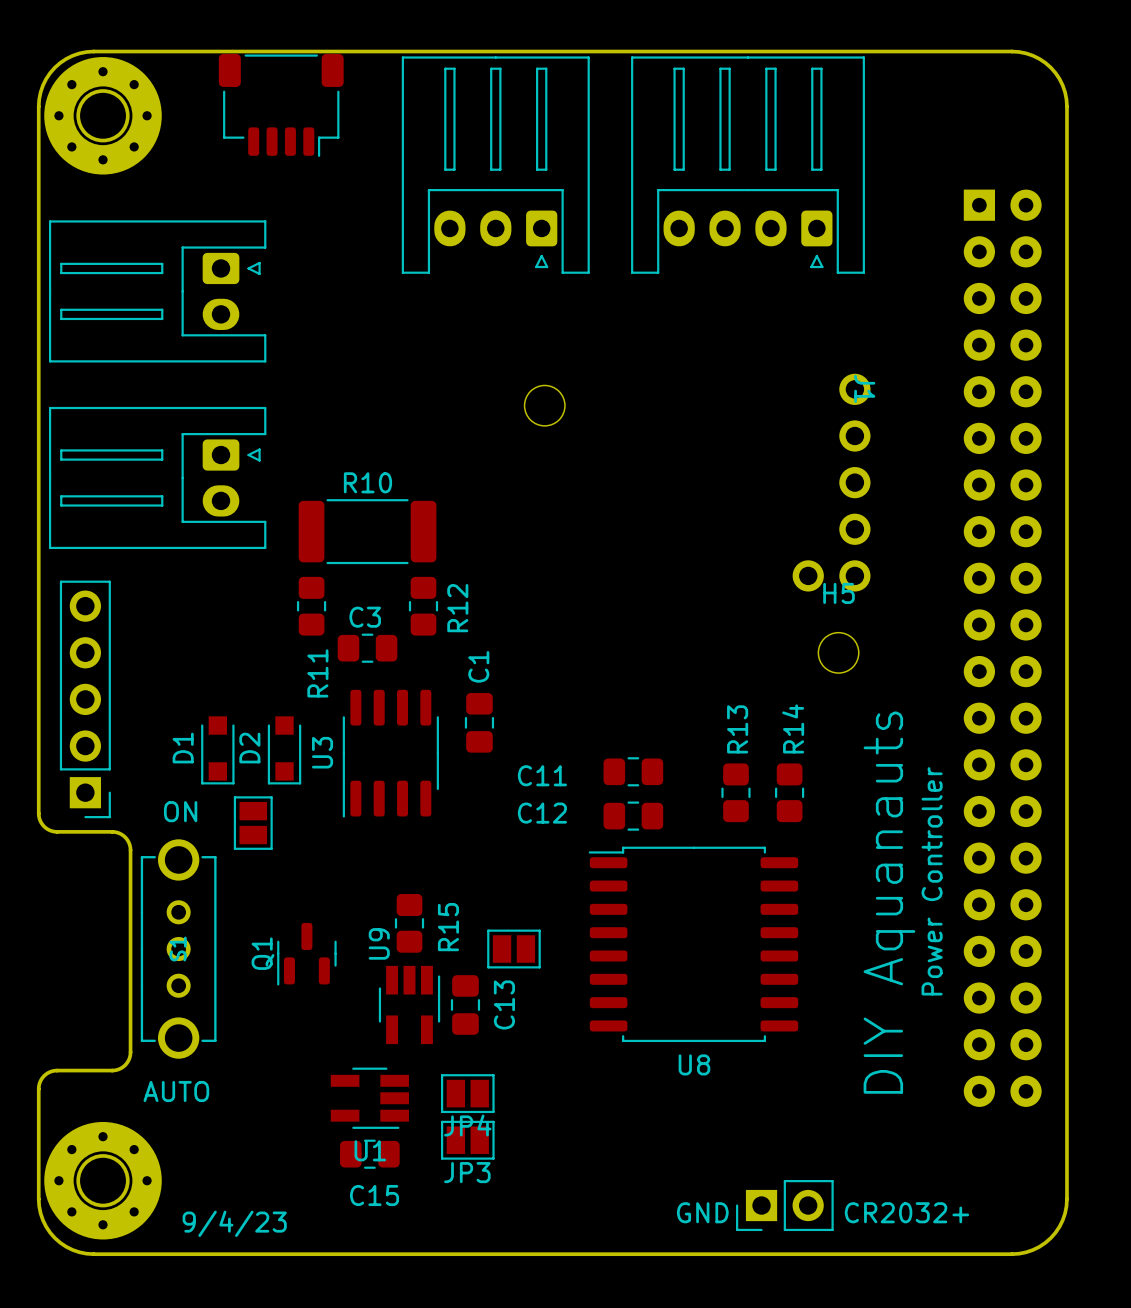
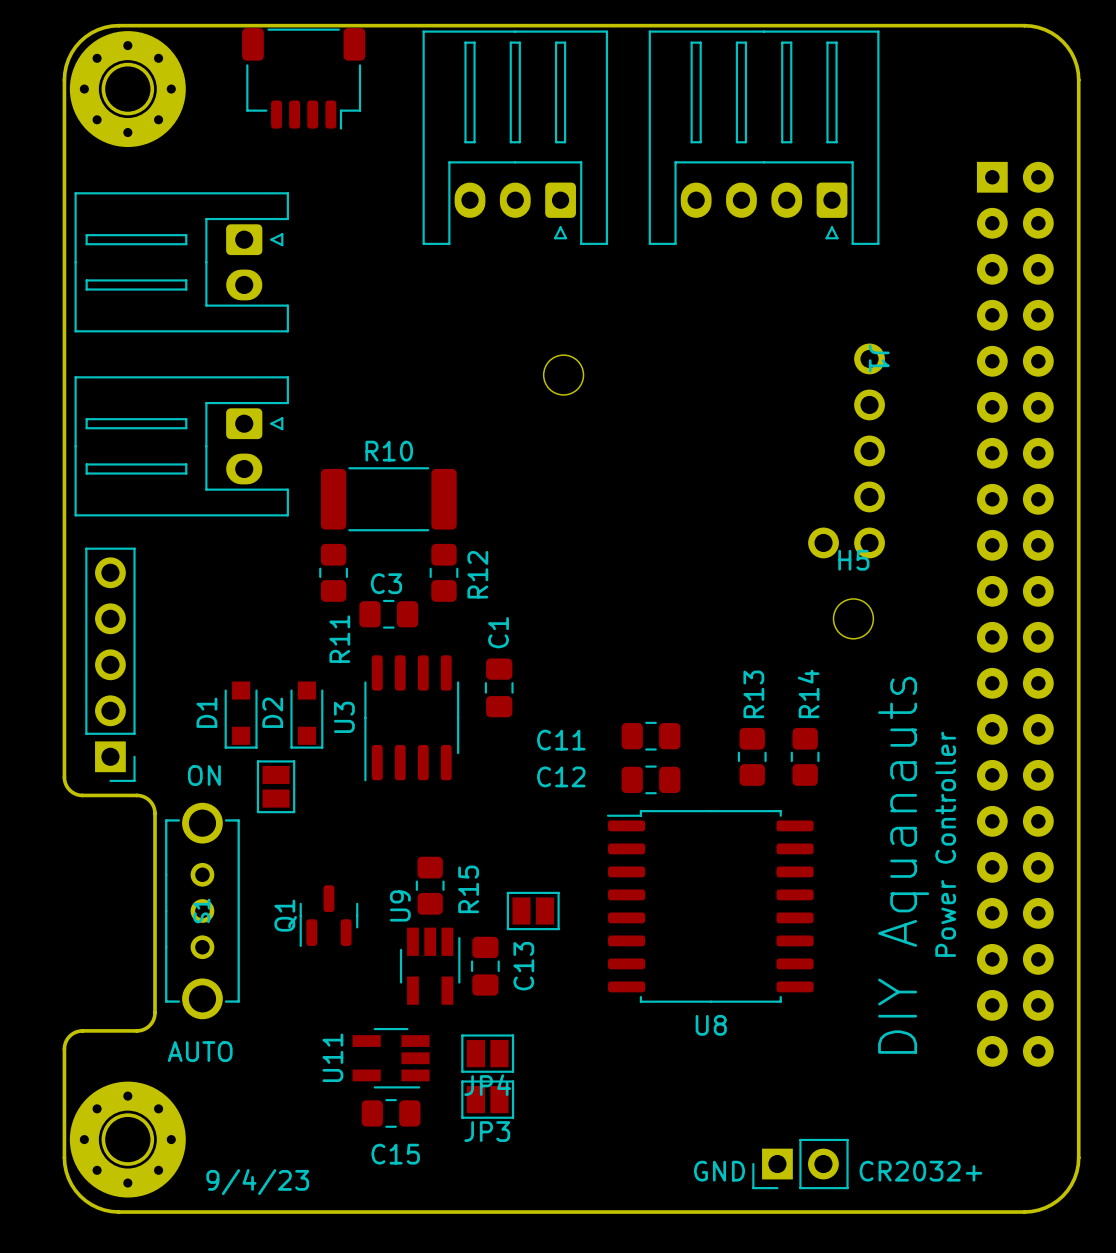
U1 name: U1 (370, 1150) -> U11 (332, 1057)

